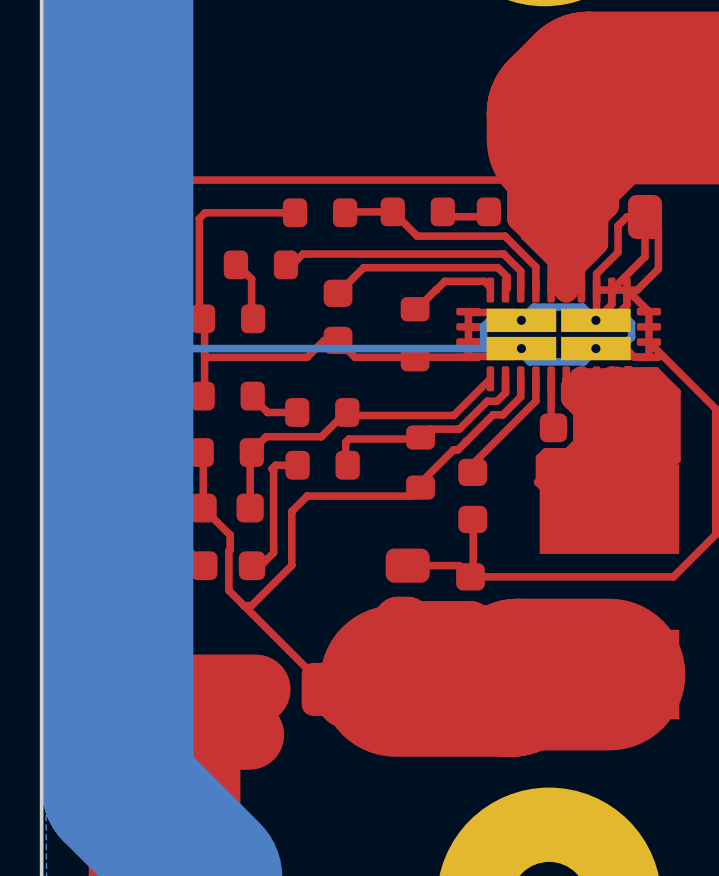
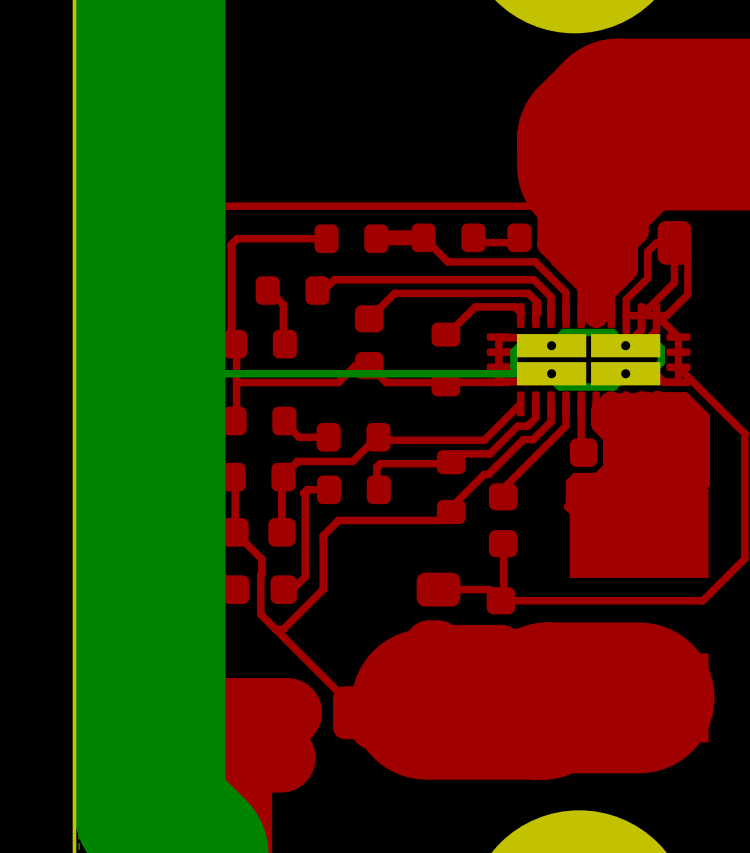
top track width: thin (392, 211) (346, 211) -> thick (423, 237) (377, 237)

